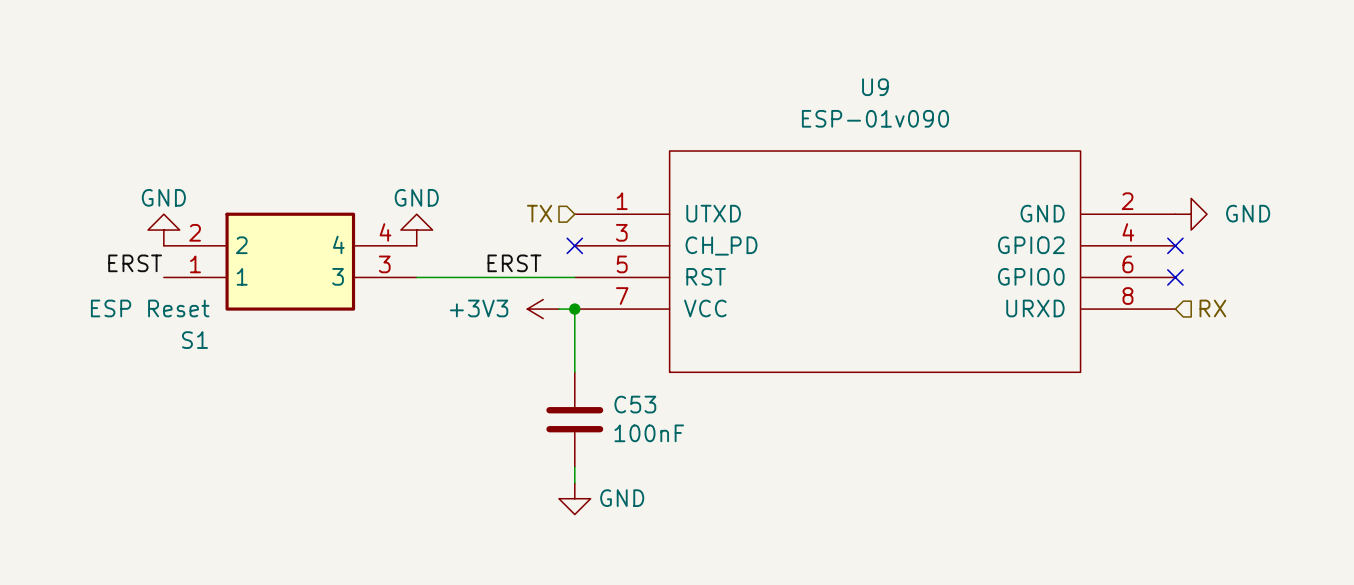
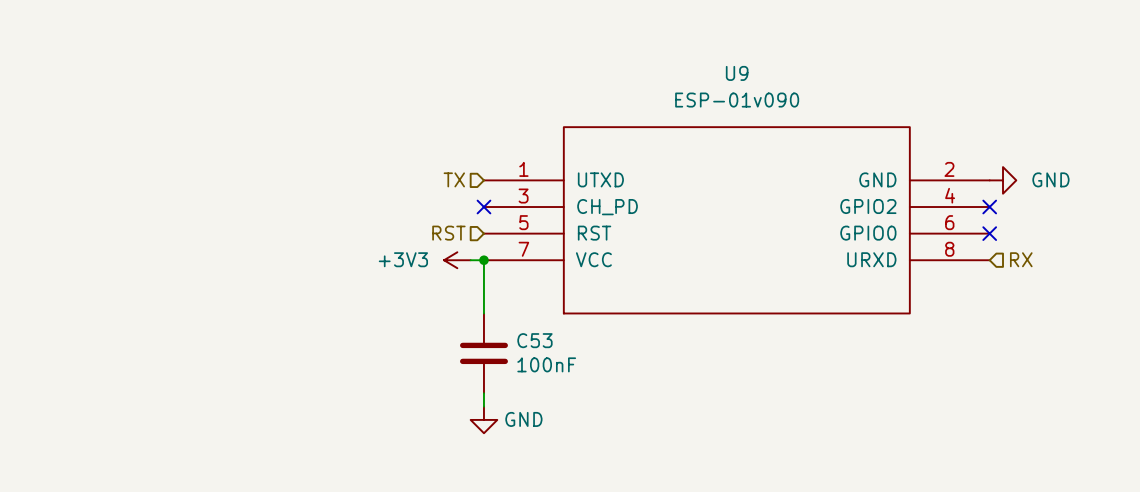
power symbol: GND (163, 230) -> none
power symbol: GND (416, 230) -> none
S1: ESP Reset (290, 261) -> none
label: ERST (135, 263) -> none
label: ERST (514, 263) -> none
hierarchical label: none -> RST (448, 233)
wire: (416, 277) (574, 277) -> none

